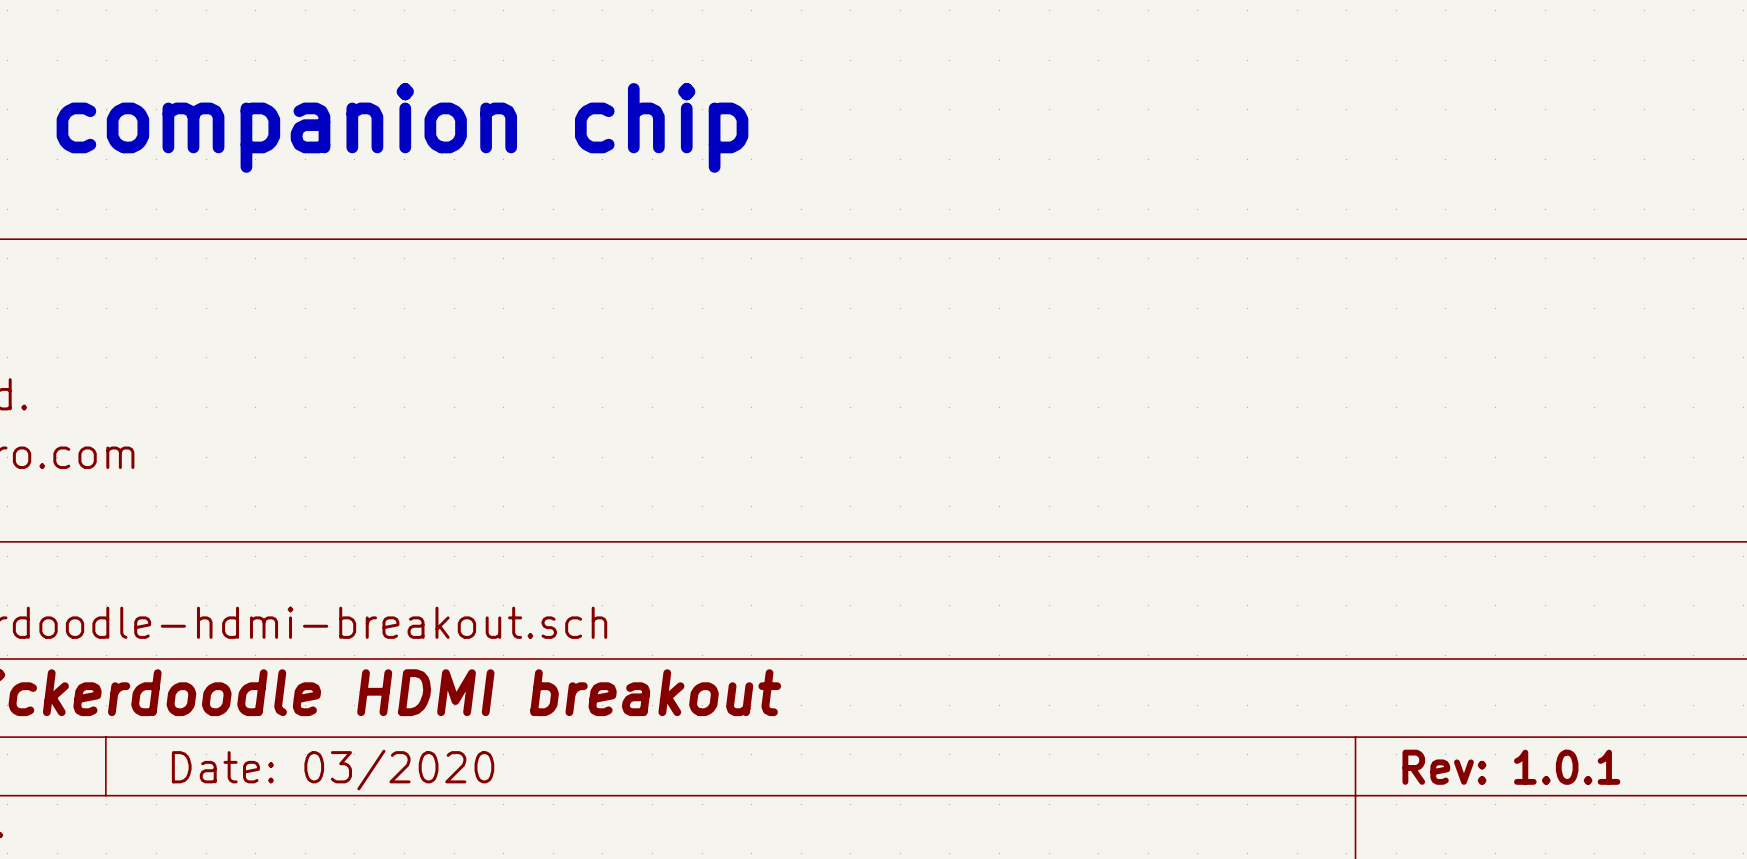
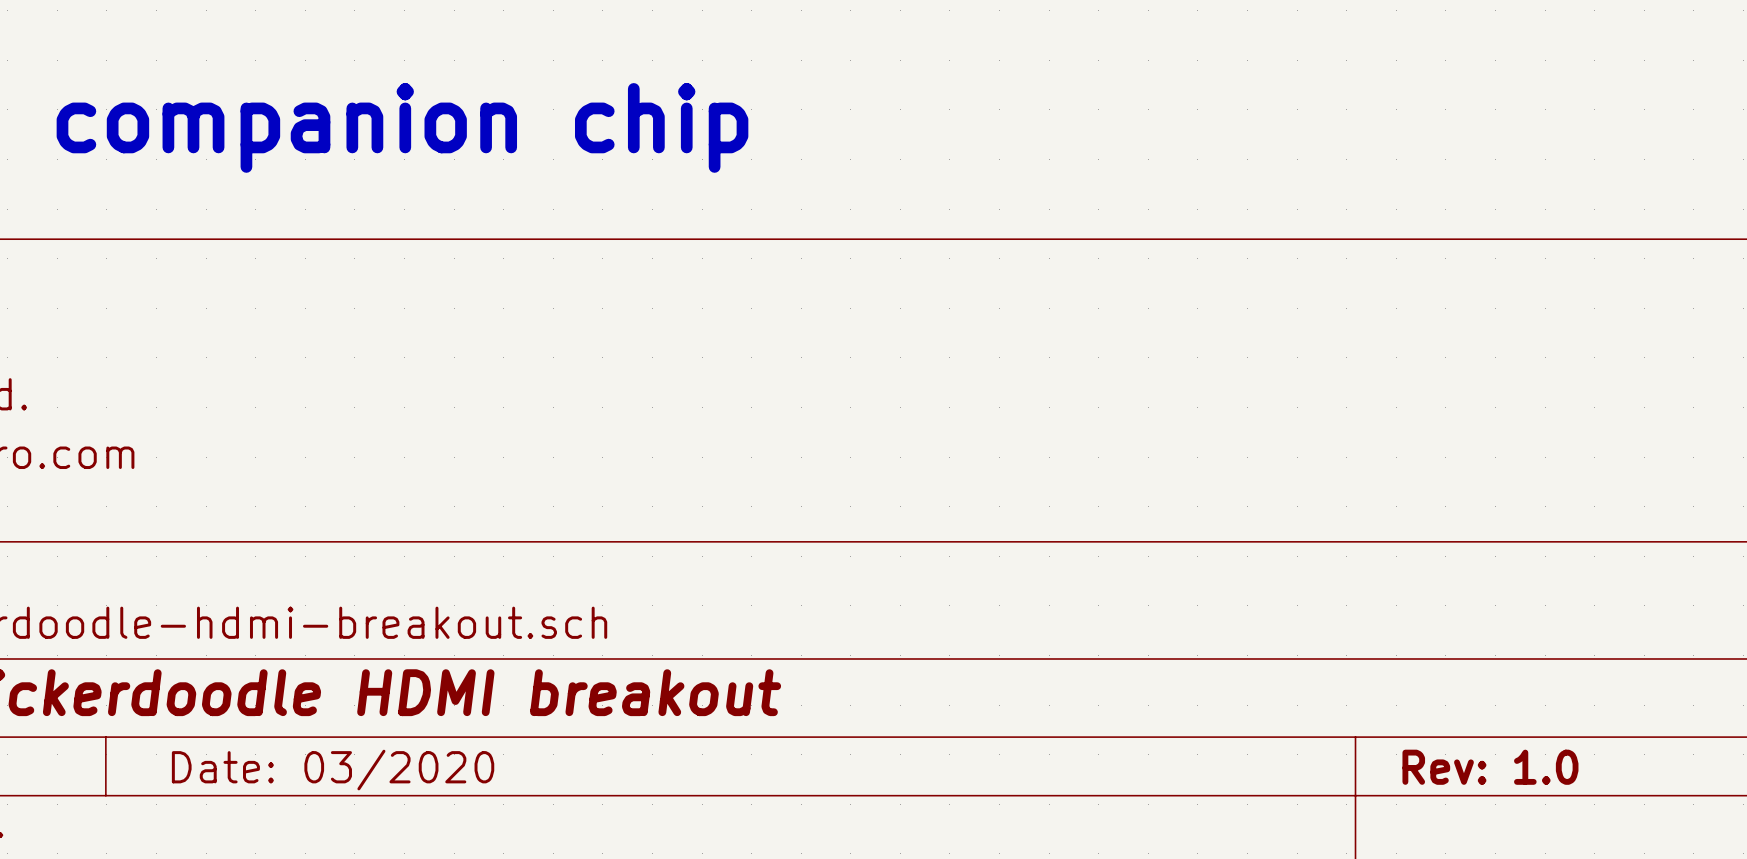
title block: Rev: 1.0.1 (1511, 767) -> Rev: 1.0 (1490, 767)

